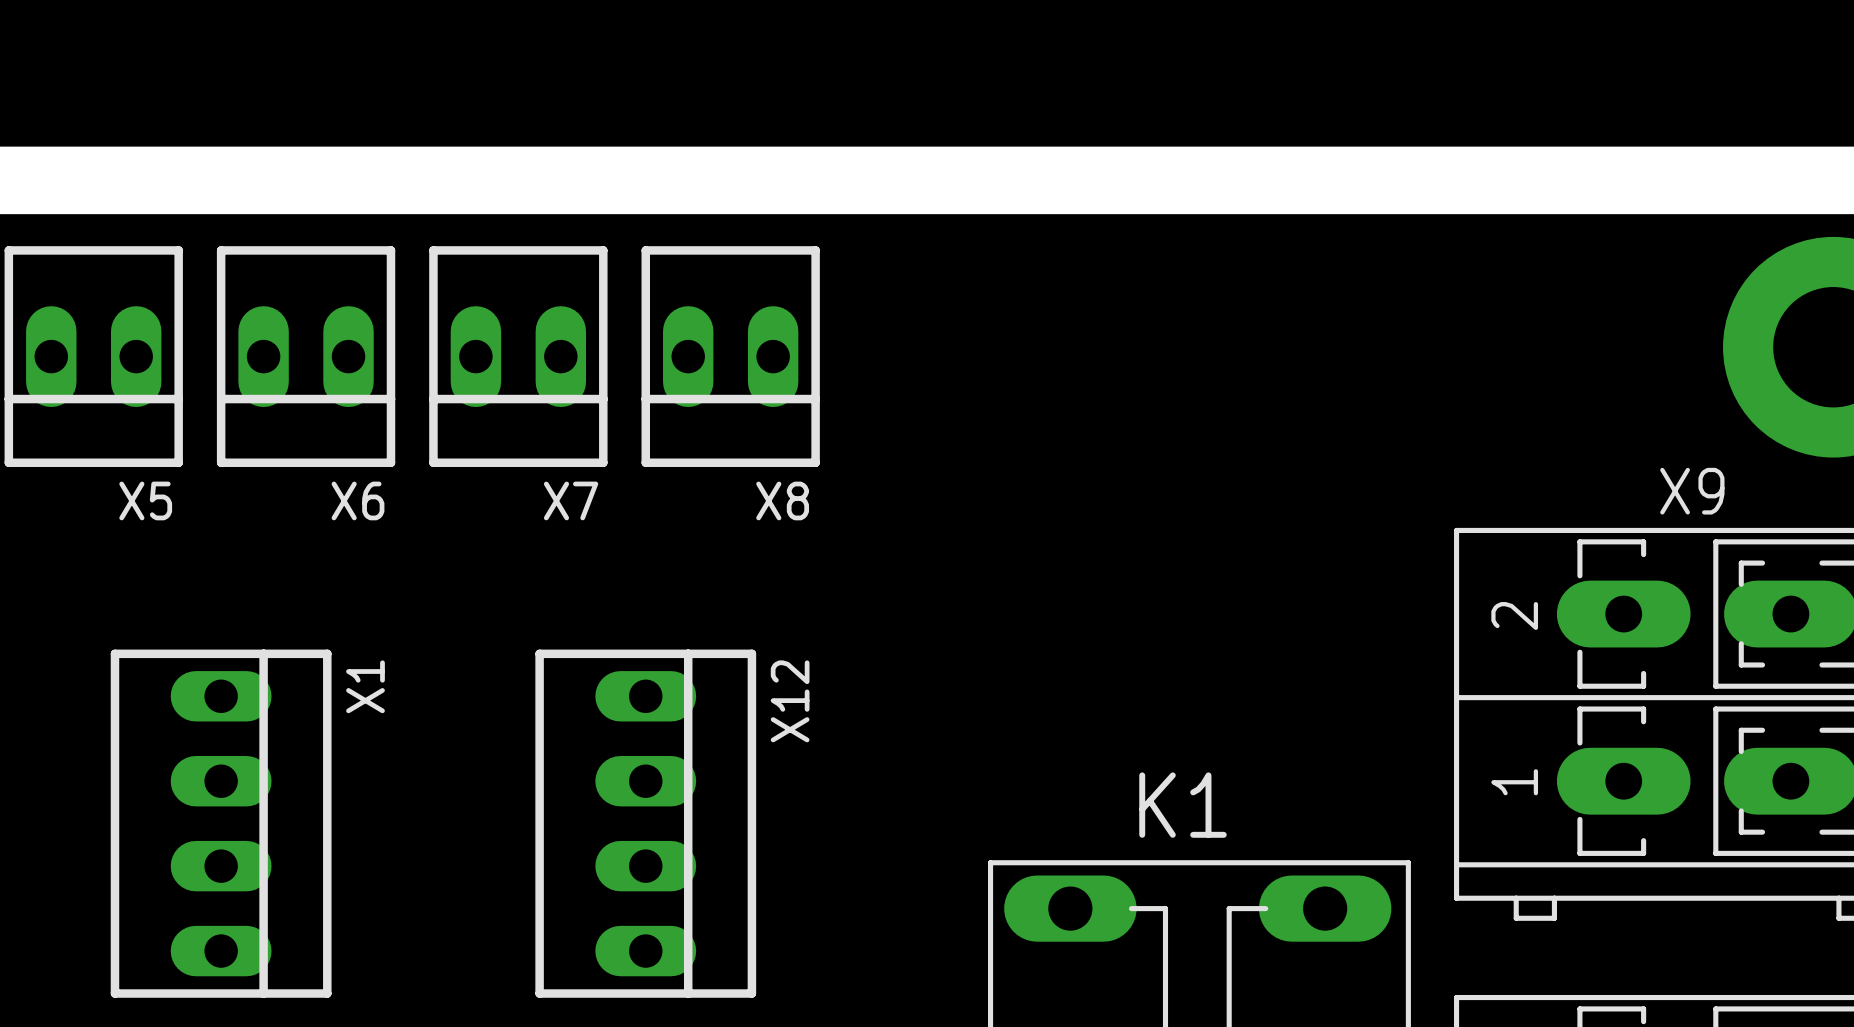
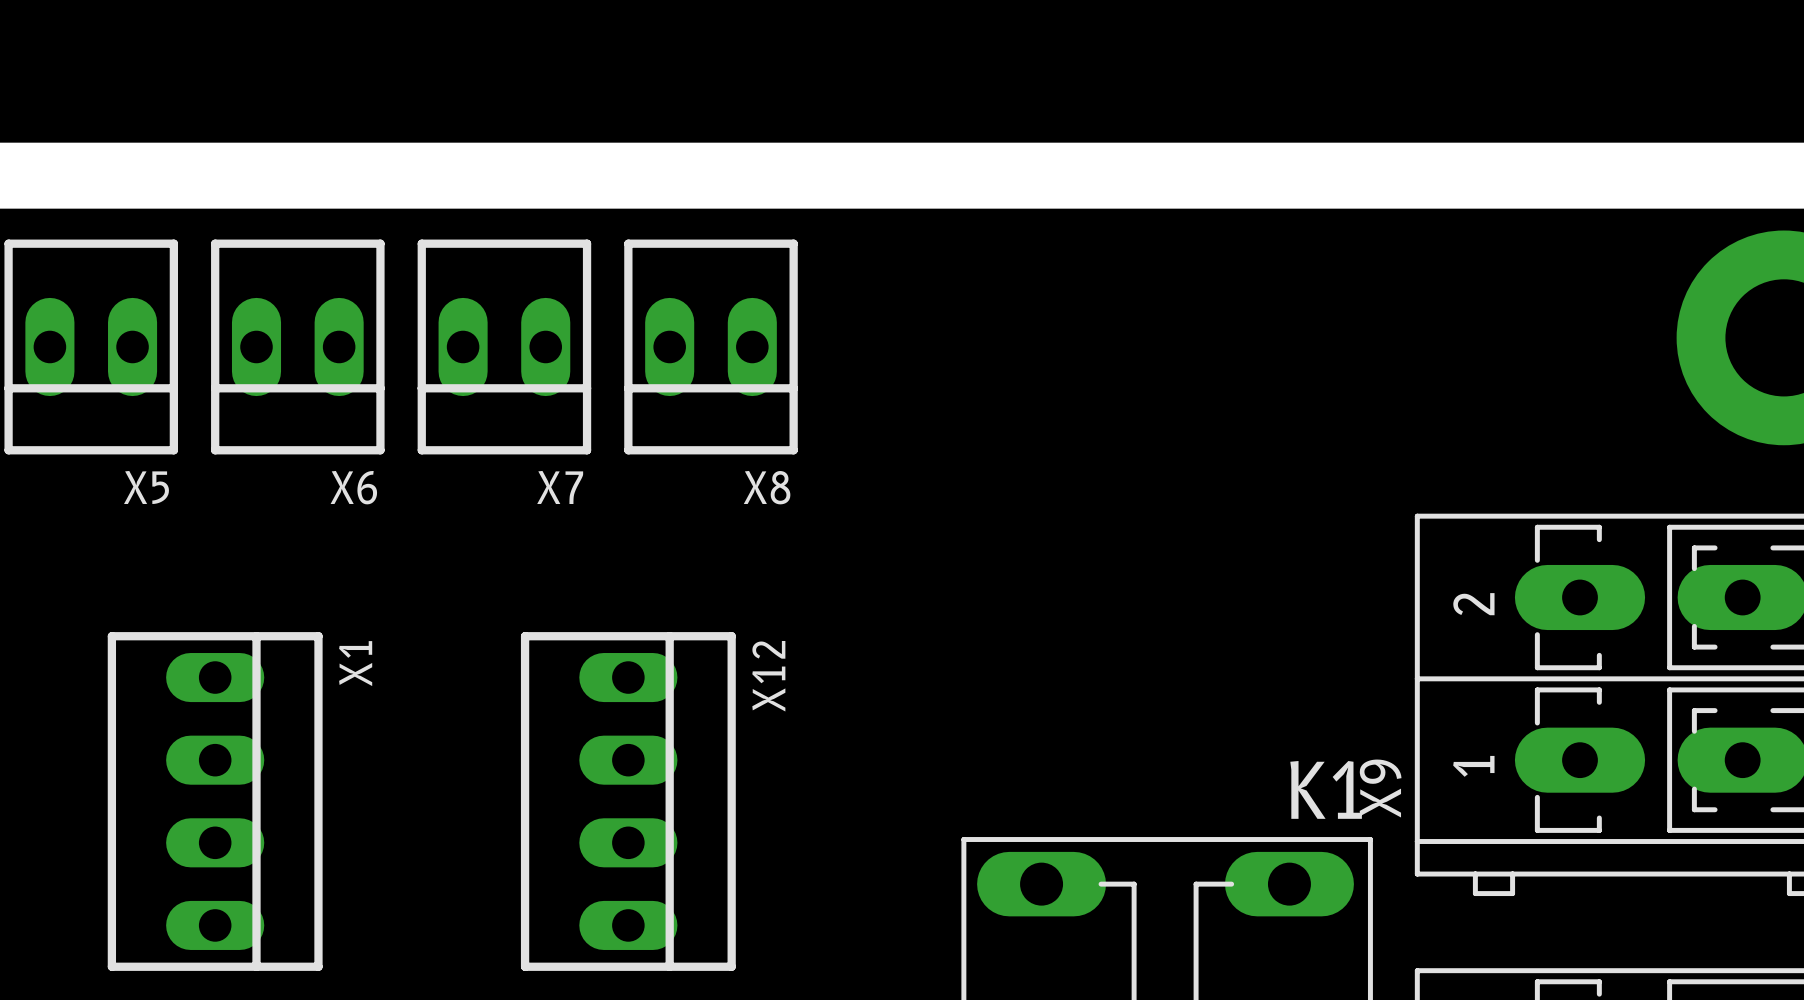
X9 name rotation: 0° (1692, 491) -> 90° counterclockwise (1380, 788)
X9 name position: X9 (1692, 491) -> X9 (1380, 788)
K1 name position: K1 (1182, 805) -> K1 (1326, 789)

